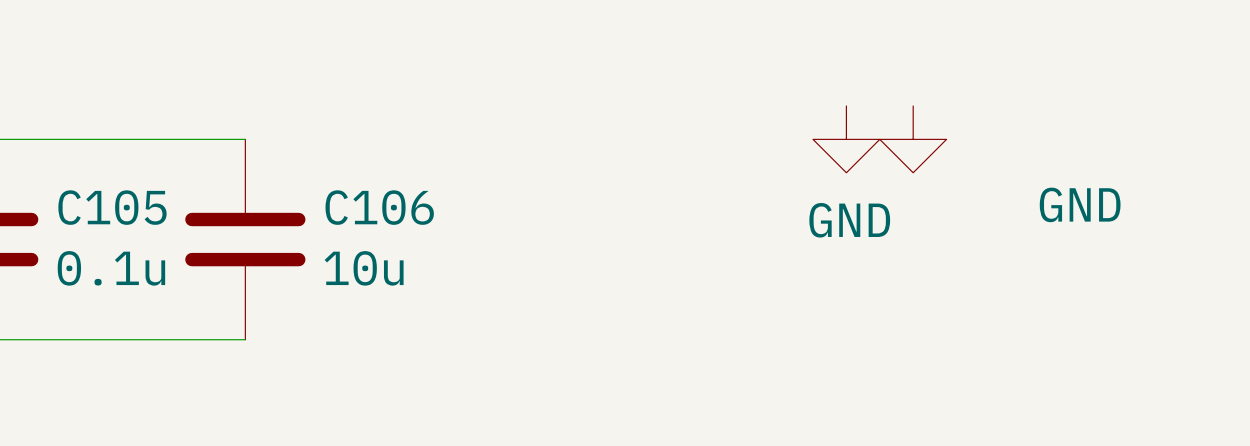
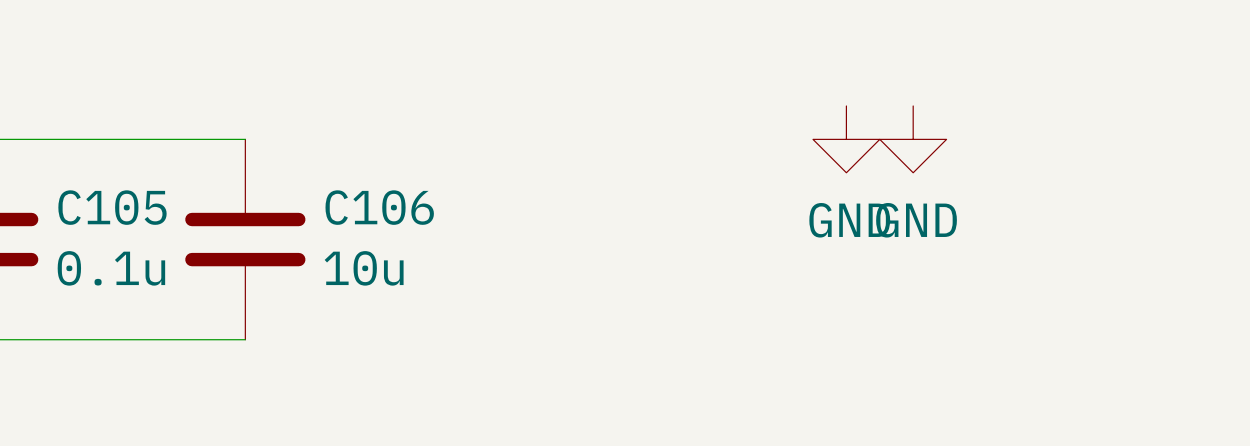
power symbol text position: GND (1080, 204) -> GND (916, 220)

